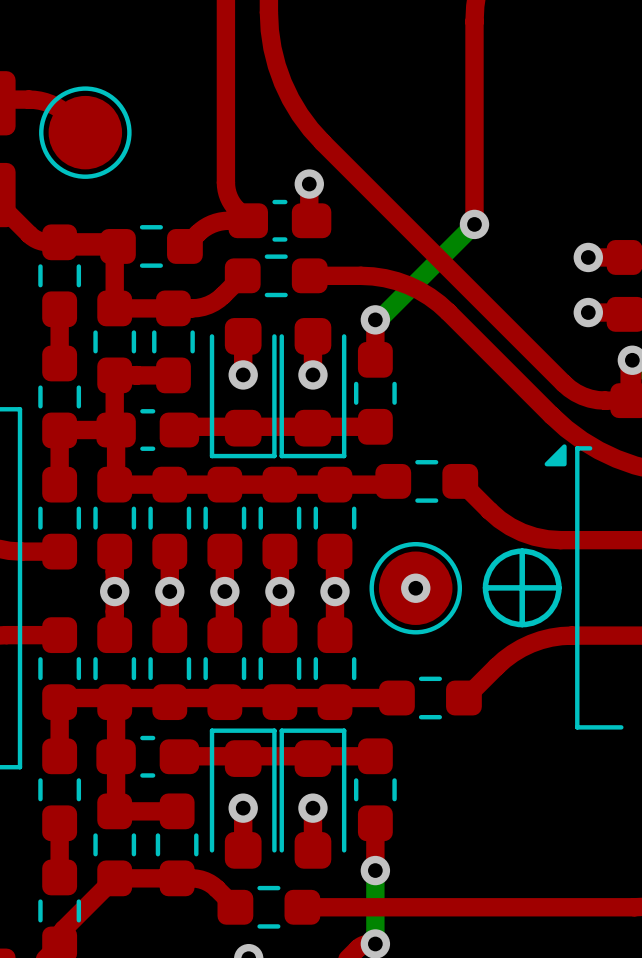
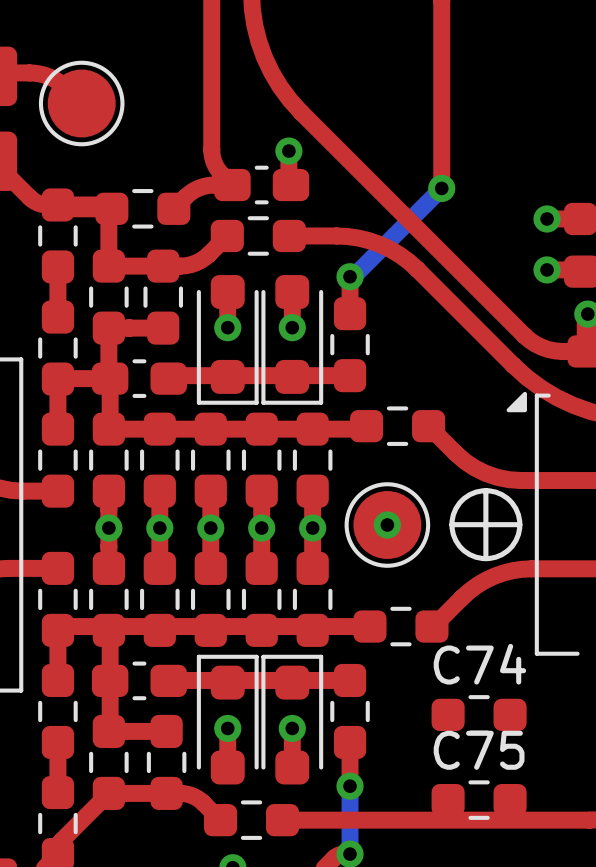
C74: none -> (479, 714)
C75: none -> (479, 800)

